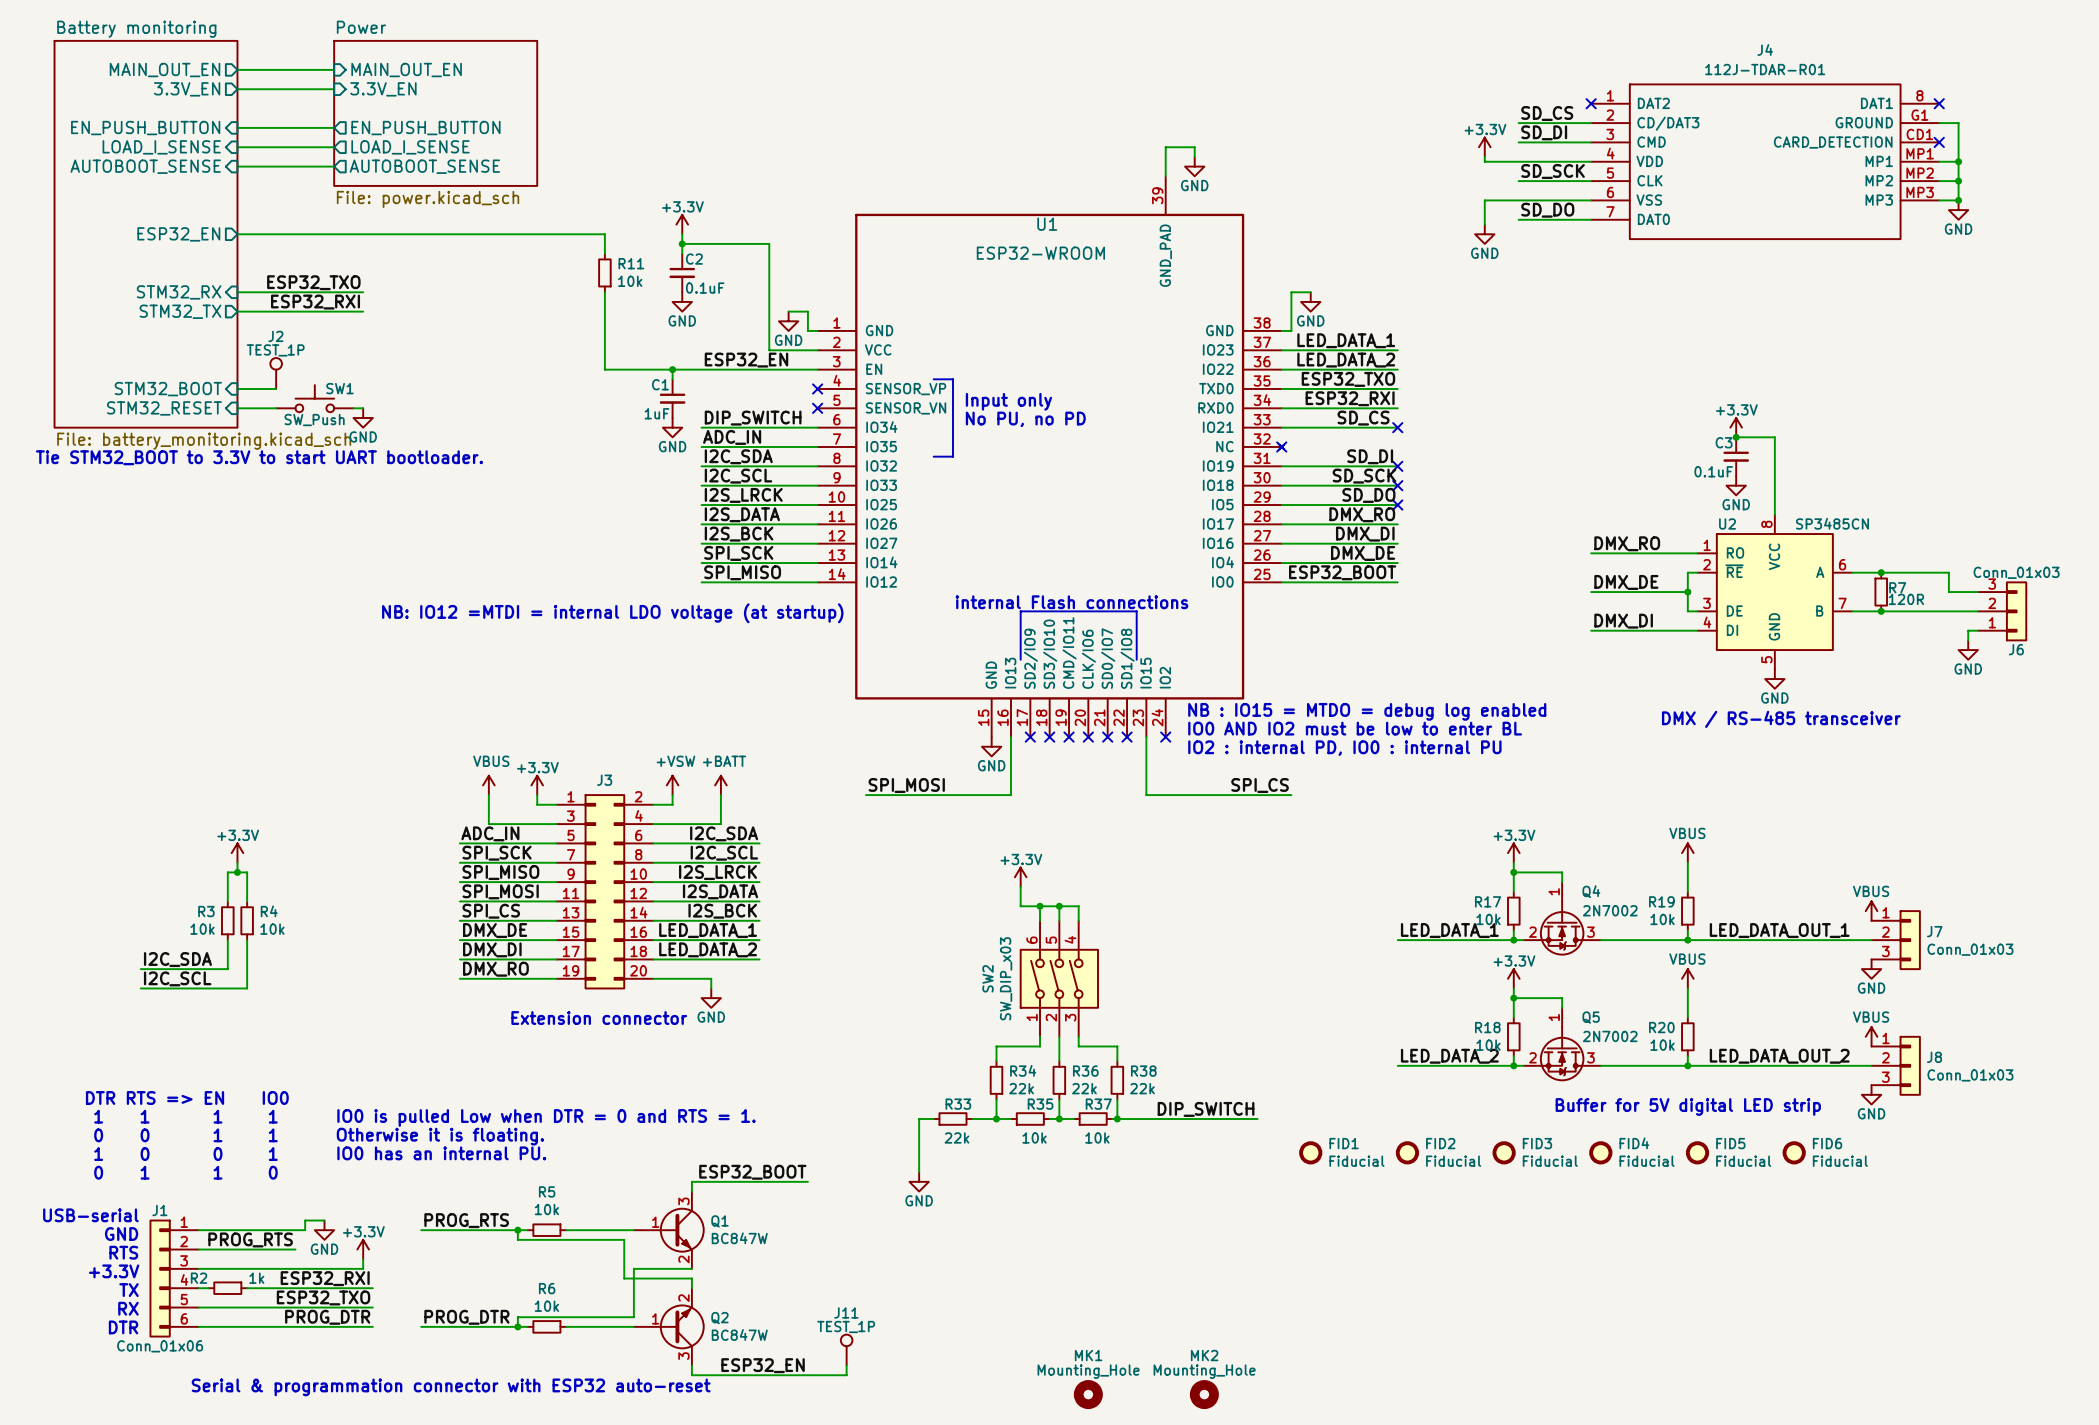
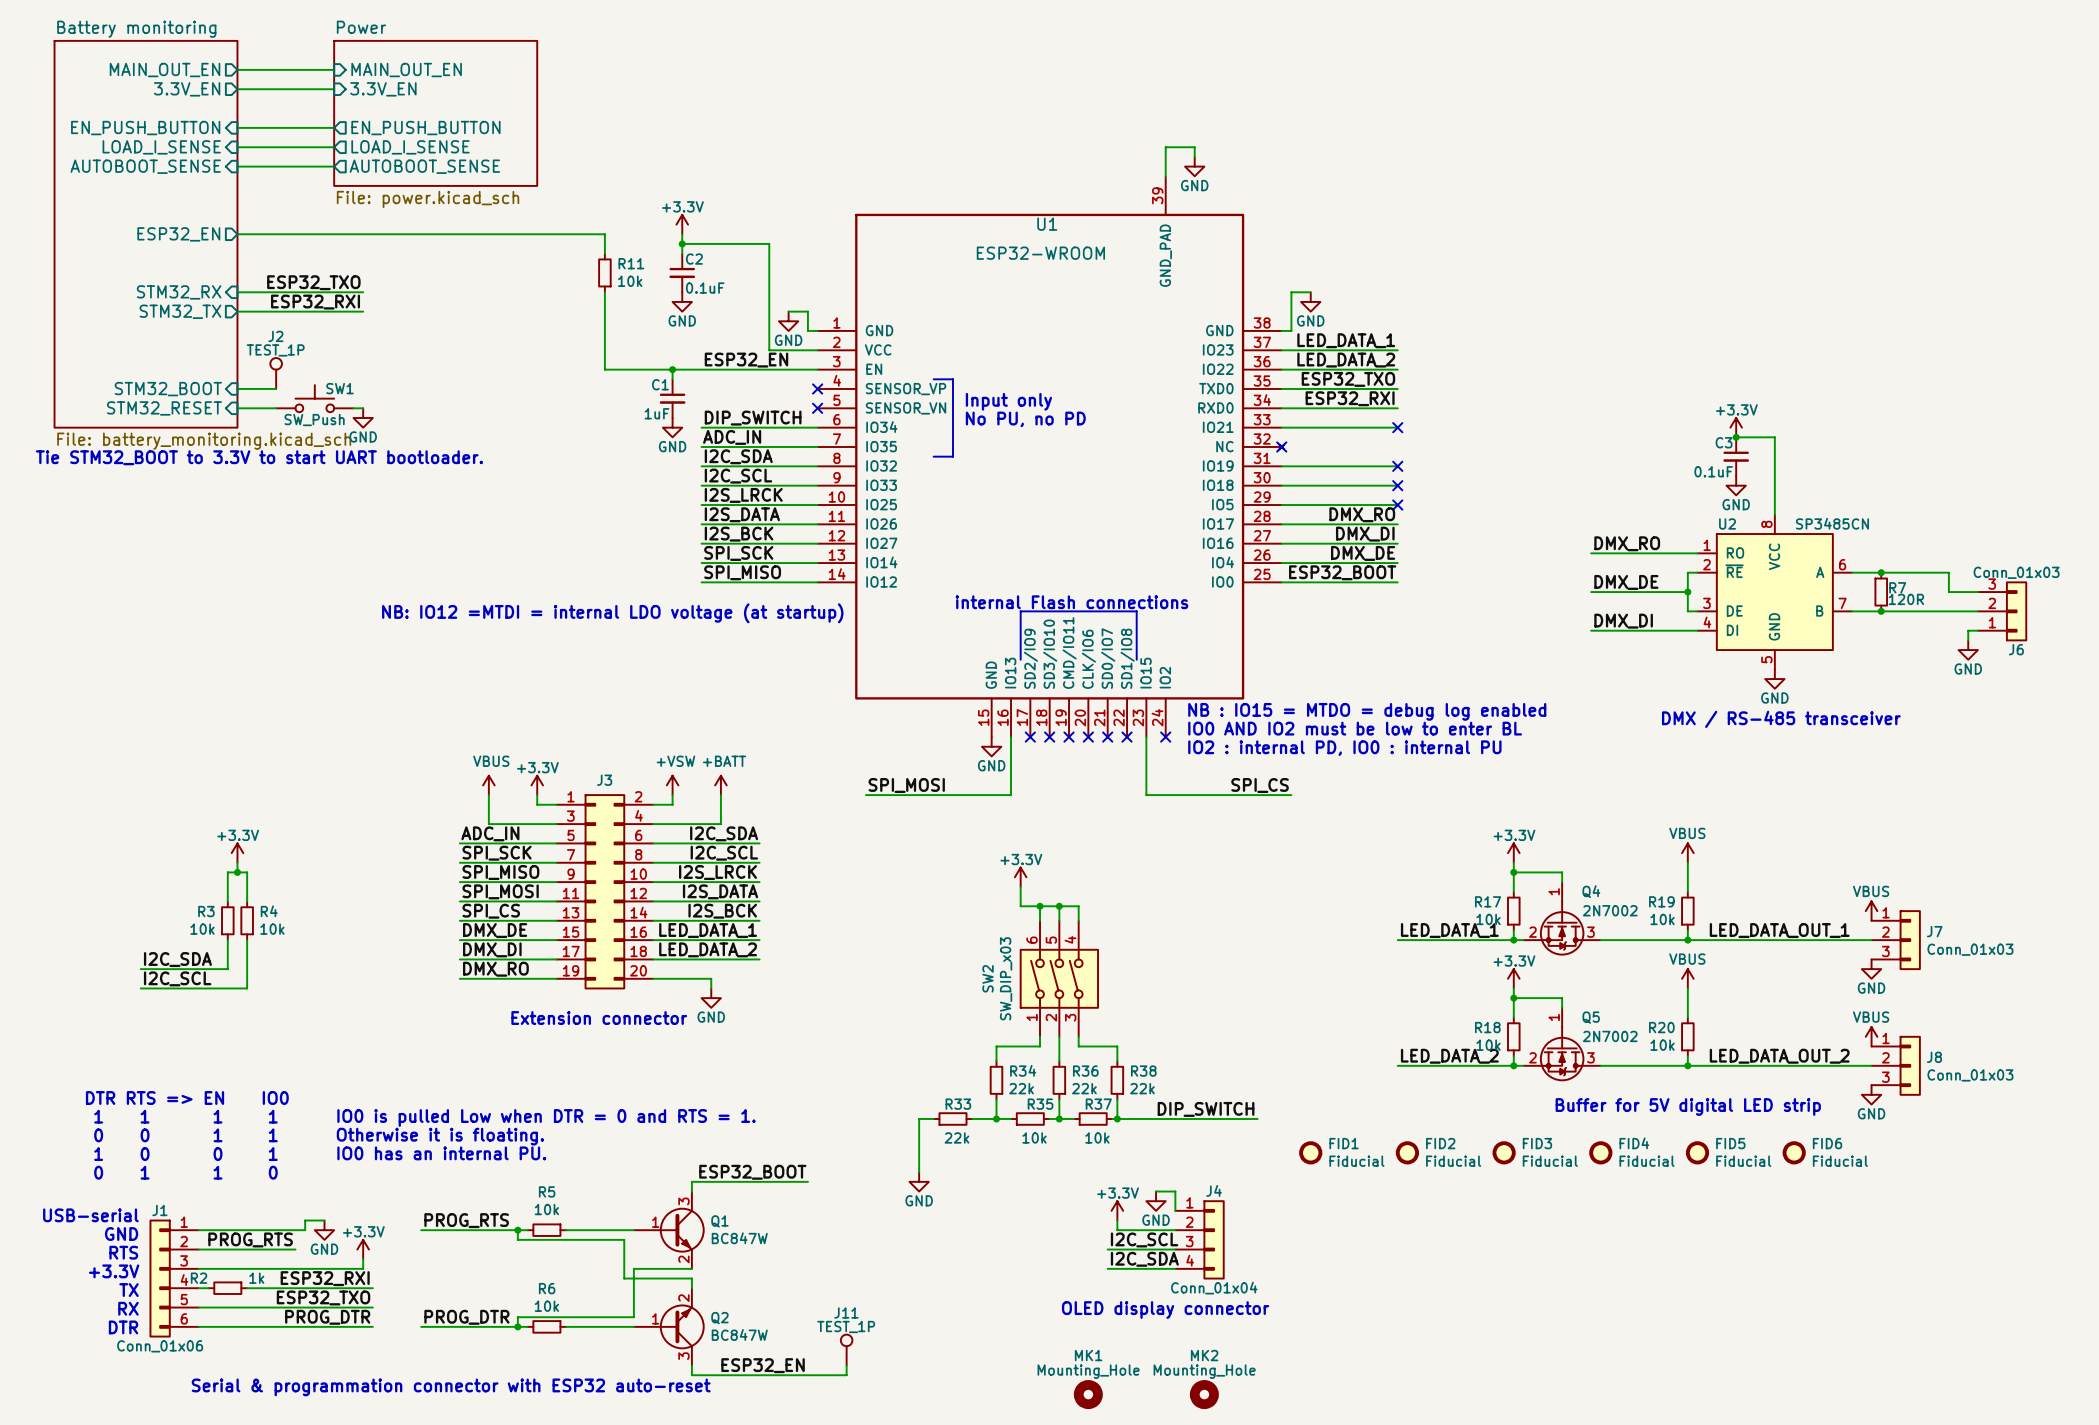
J4 name position: J4 (1765, 49) -> J4 (1214, 1190)
J4 value: 112J-TDAR-R01 (1765, 69) -> Conn_01x04 (1214, 1288)
J4 symbol: [1591, 83, 1940, 240] -> [1175, 1200, 1225, 1280]
no-connect mark: (1591, 103) -> none
no-connect mark: (1939, 103) -> none
label: SD_CS (1547, 113) -> none
wire: (1518, 123) (1591, 123) -> none
wire: (1939, 123) (1958, 123) (1958, 200) (1939, 200) -> none
label: SD_DI (1544, 132) -> none
wire: (1518, 142) (1591, 142) -> none
no-connect mark: (1939, 142) -> none
power symbol: +3.3V (1484, 147) -> none
wire: (1484, 156) (1484, 161) (1591, 161) -> none
wire: (1939, 161) (1958, 161) -> none
junction: (1958, 161) -> none
label: SD_SCK (1553, 171) -> none
wire: (1518, 181) (1591, 181) -> none
wire: (1939, 181) (1958, 181) -> none
junction: (1958, 181) -> none
wire: (1591, 200) (1484, 200) (1484, 224) -> none
junction: (1958, 200) -> none
label: SD_DO (1547, 210) -> none
power symbol: GND (1958, 210) -> none
wire: (1518, 219) (1591, 219) -> none
power symbol: GND (1484, 234) -> none
label: SD_CS (1363, 418) -> none
label: SD_DI (1370, 456) -> none
label: SD_SCK (1364, 476) -> none
label: SD_DO (1368, 495) -> none
wire: none -> (1156, 1191) (1175, 1191) (1175, 1210)
power symbol: none -> GND (1156, 1201)
power symbol: none -> +3.3V (1117, 1210)
wire: none -> (1117, 1220) (1117, 1230) (1175, 1230)
label: none -> I2C_SCL (1144, 1239)
wire: none -> (1107, 1249) (1175, 1249)
label: none -> I2C_SDA (1144, 1259)
wire: none -> (1107, 1268) (1175, 1268)
text: none -> OLED display connector (1165, 1310)

